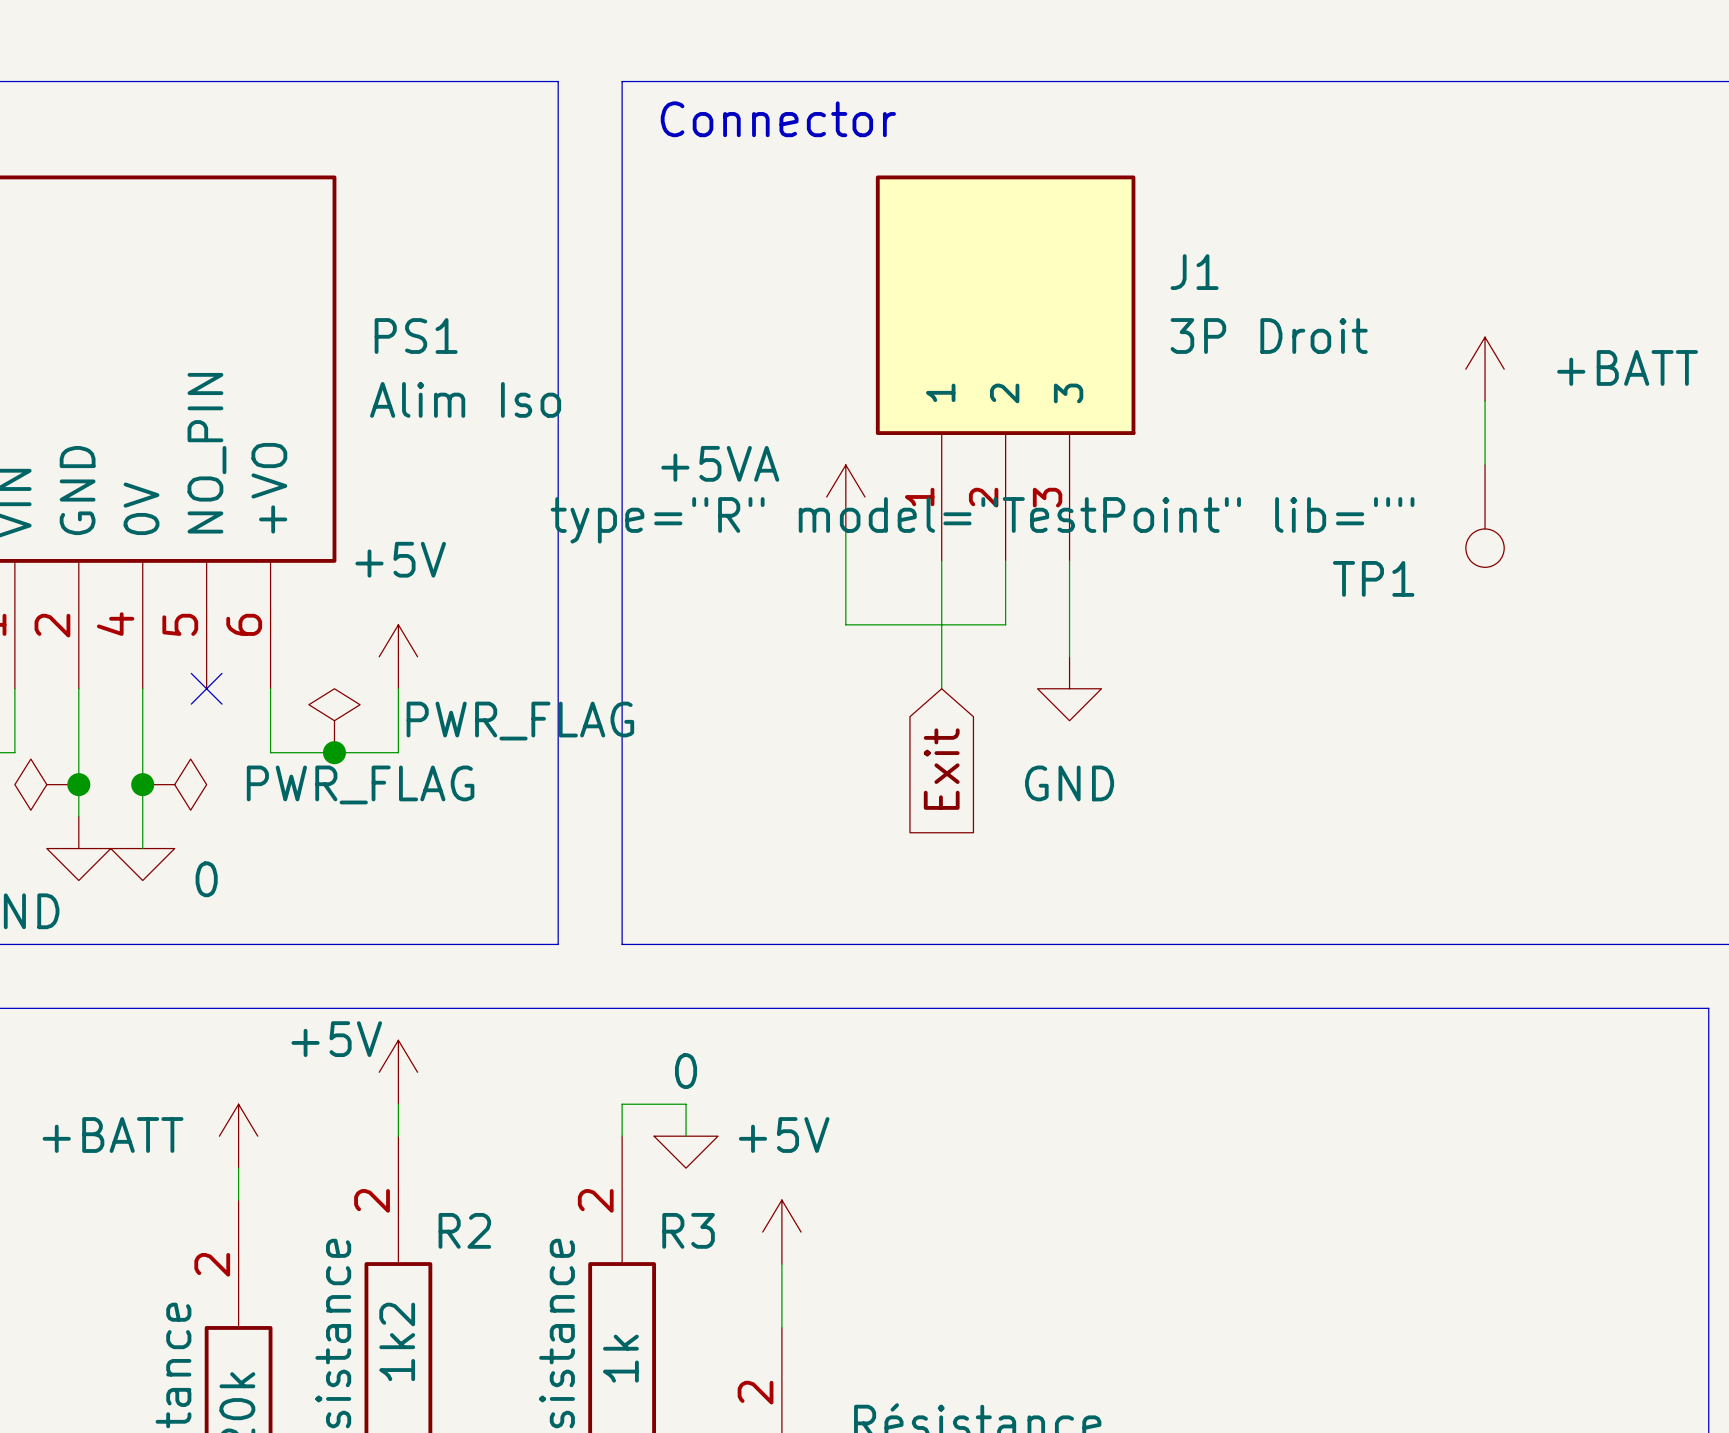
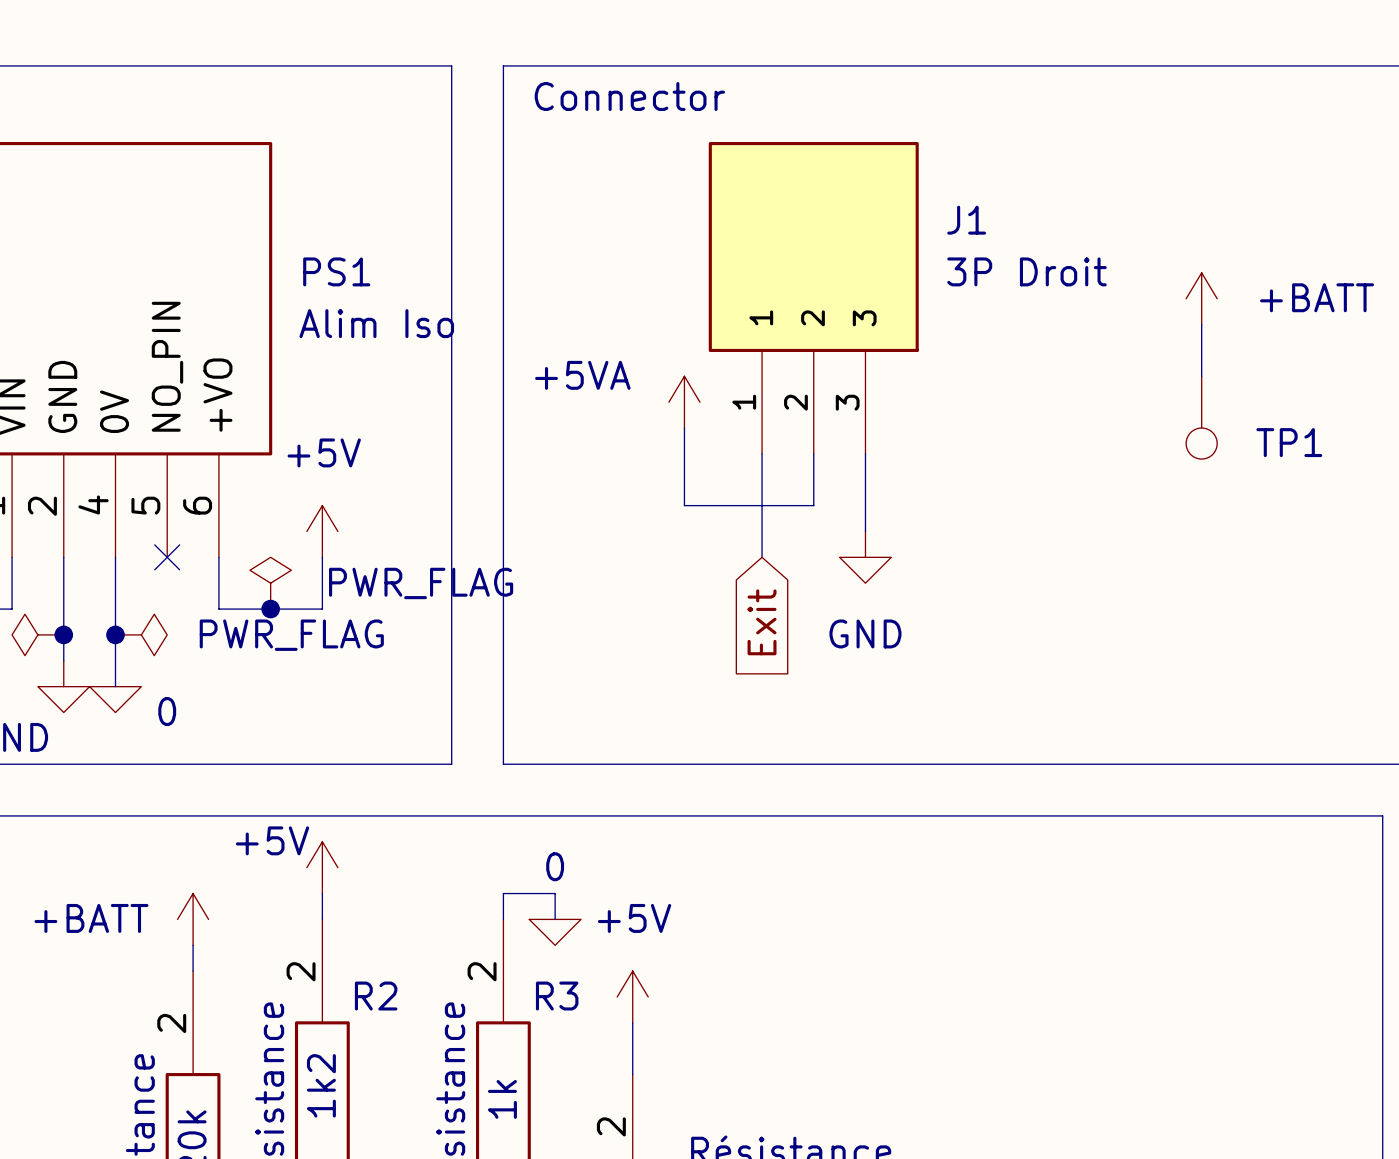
TP1 value: type="R" model="TestPoint" lib="" (982, 520) -> none
TP1 name position: TP1 (1373, 578) -> TP1 (1289, 442)

